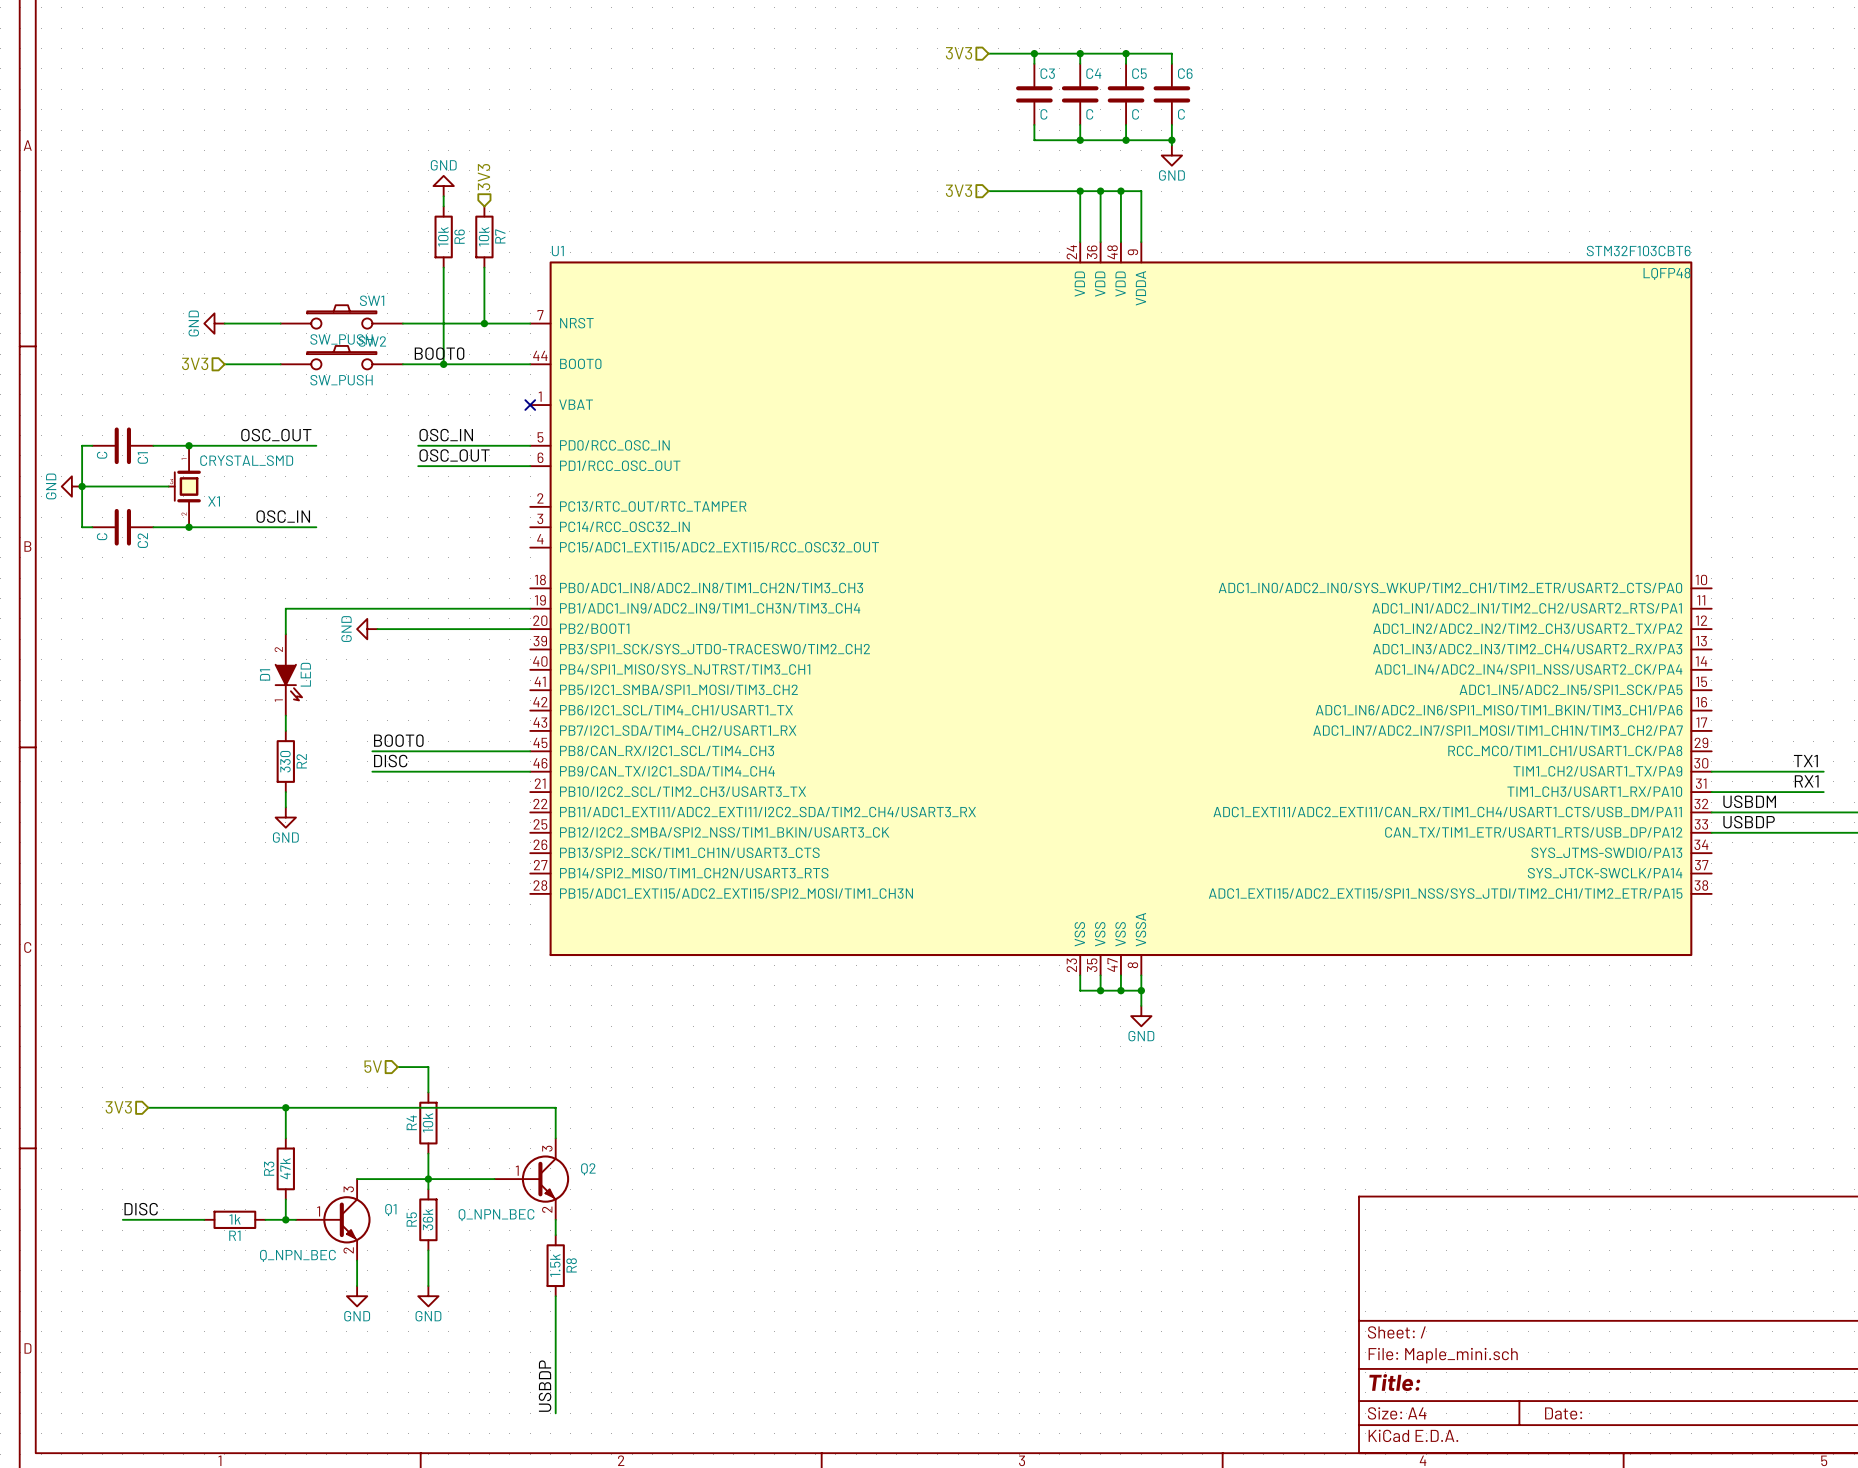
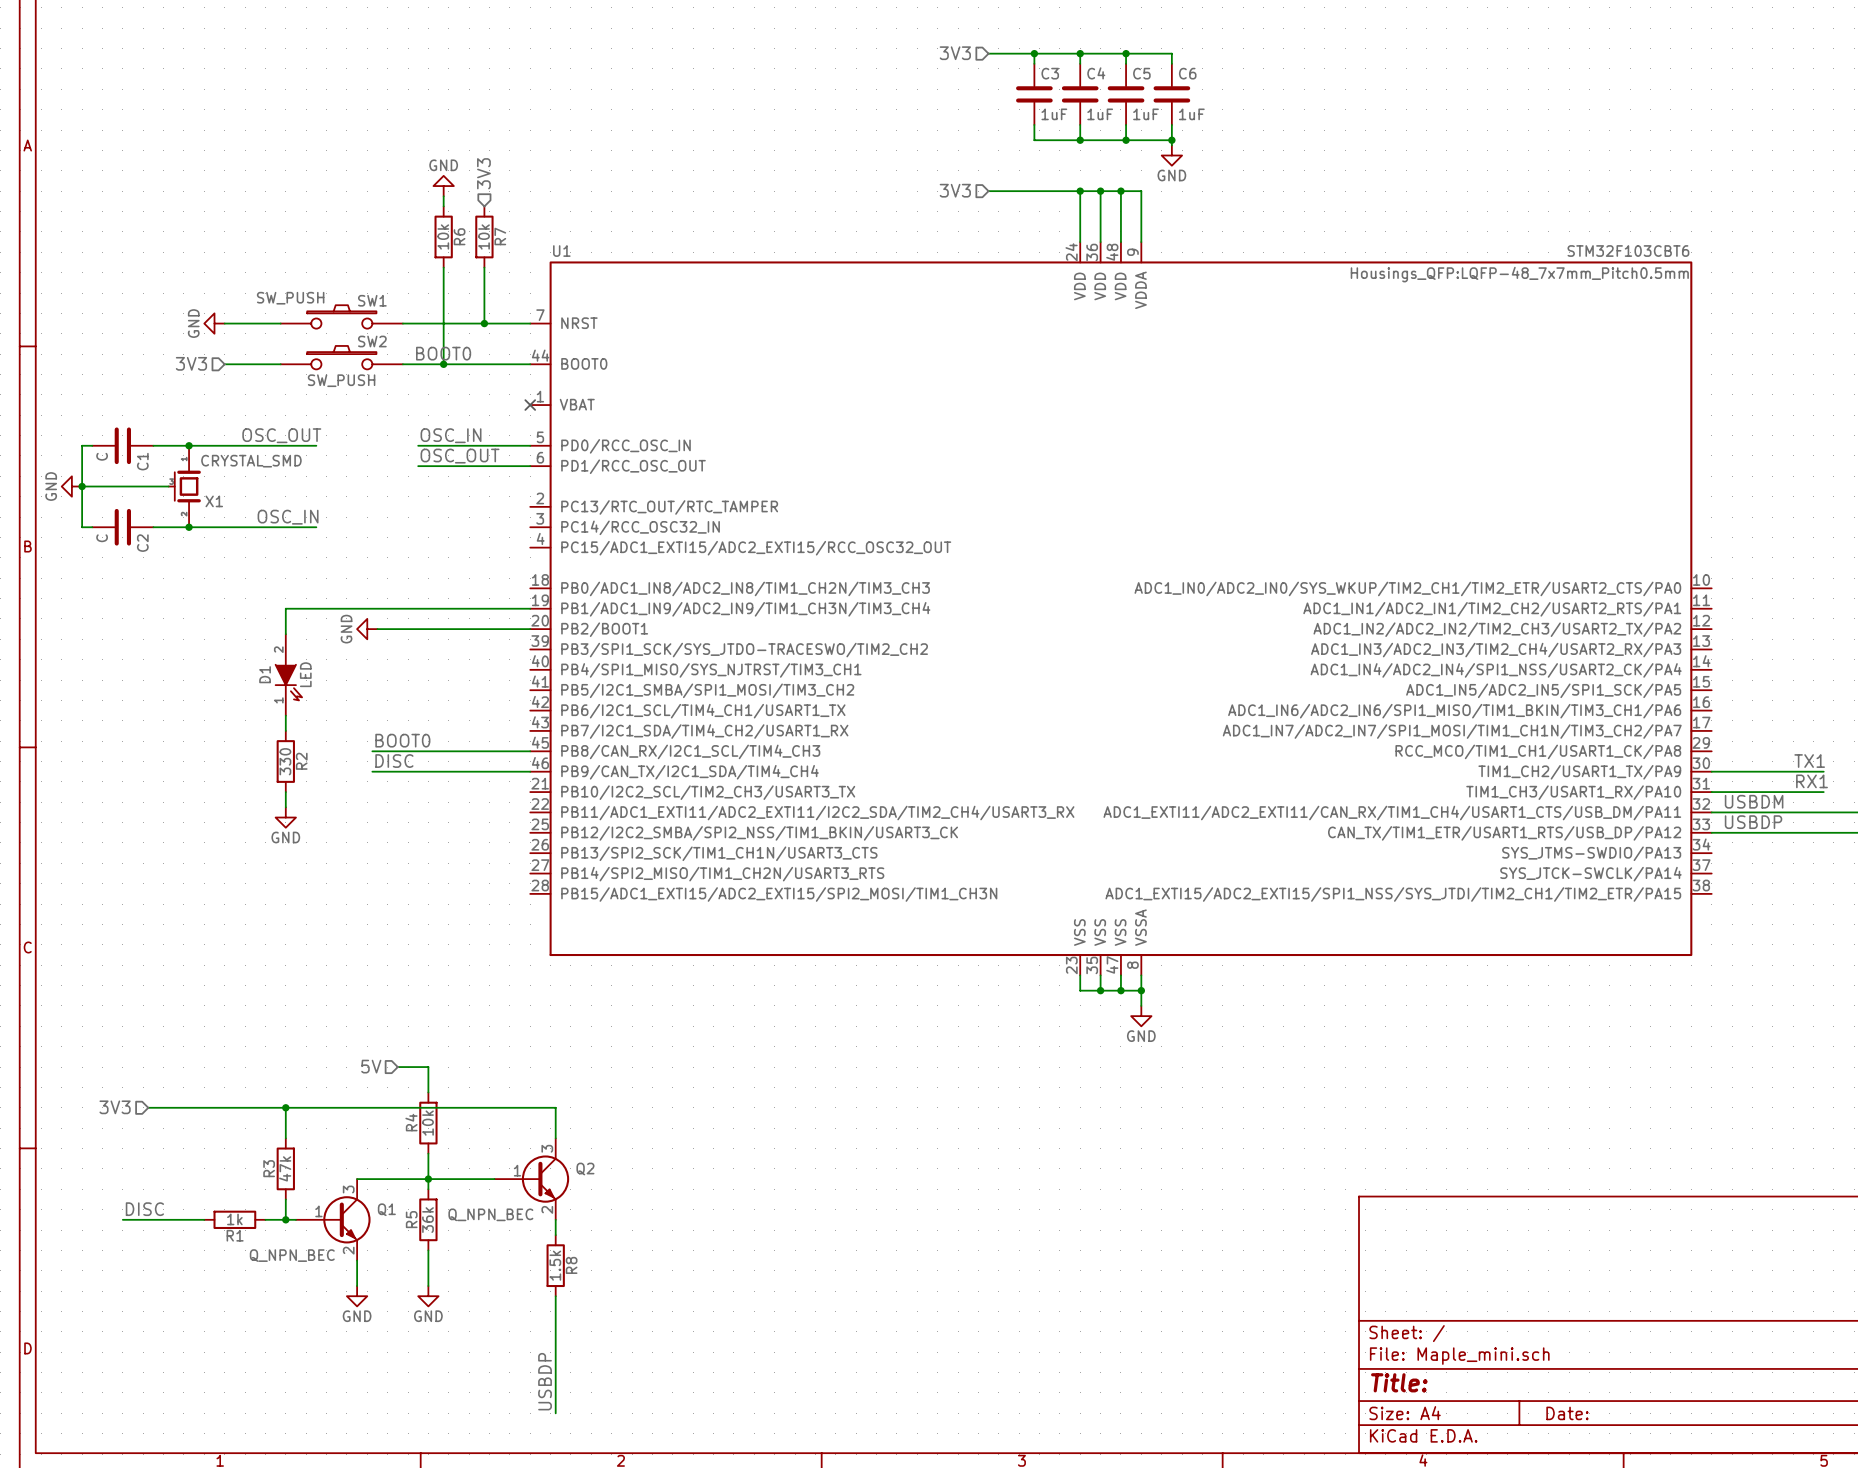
C3 value: C (1043, 114) -> 1uF (1054, 114)
C4 value: C (1089, 114) -> 1uF (1100, 114)
C5 value: C (1135, 114) -> 1uF (1146, 114)
C6 value: C (1181, 114) -> 1uF (1191, 114)
U1 text: LQFP48 (1666, 273) -> Housings_QFP:LQFP-48_7x7mm_Pitch0.5mm (1519, 274)
SW1 value position: SW_PUSH (341, 339) -> SW_PUSH (290, 298)

